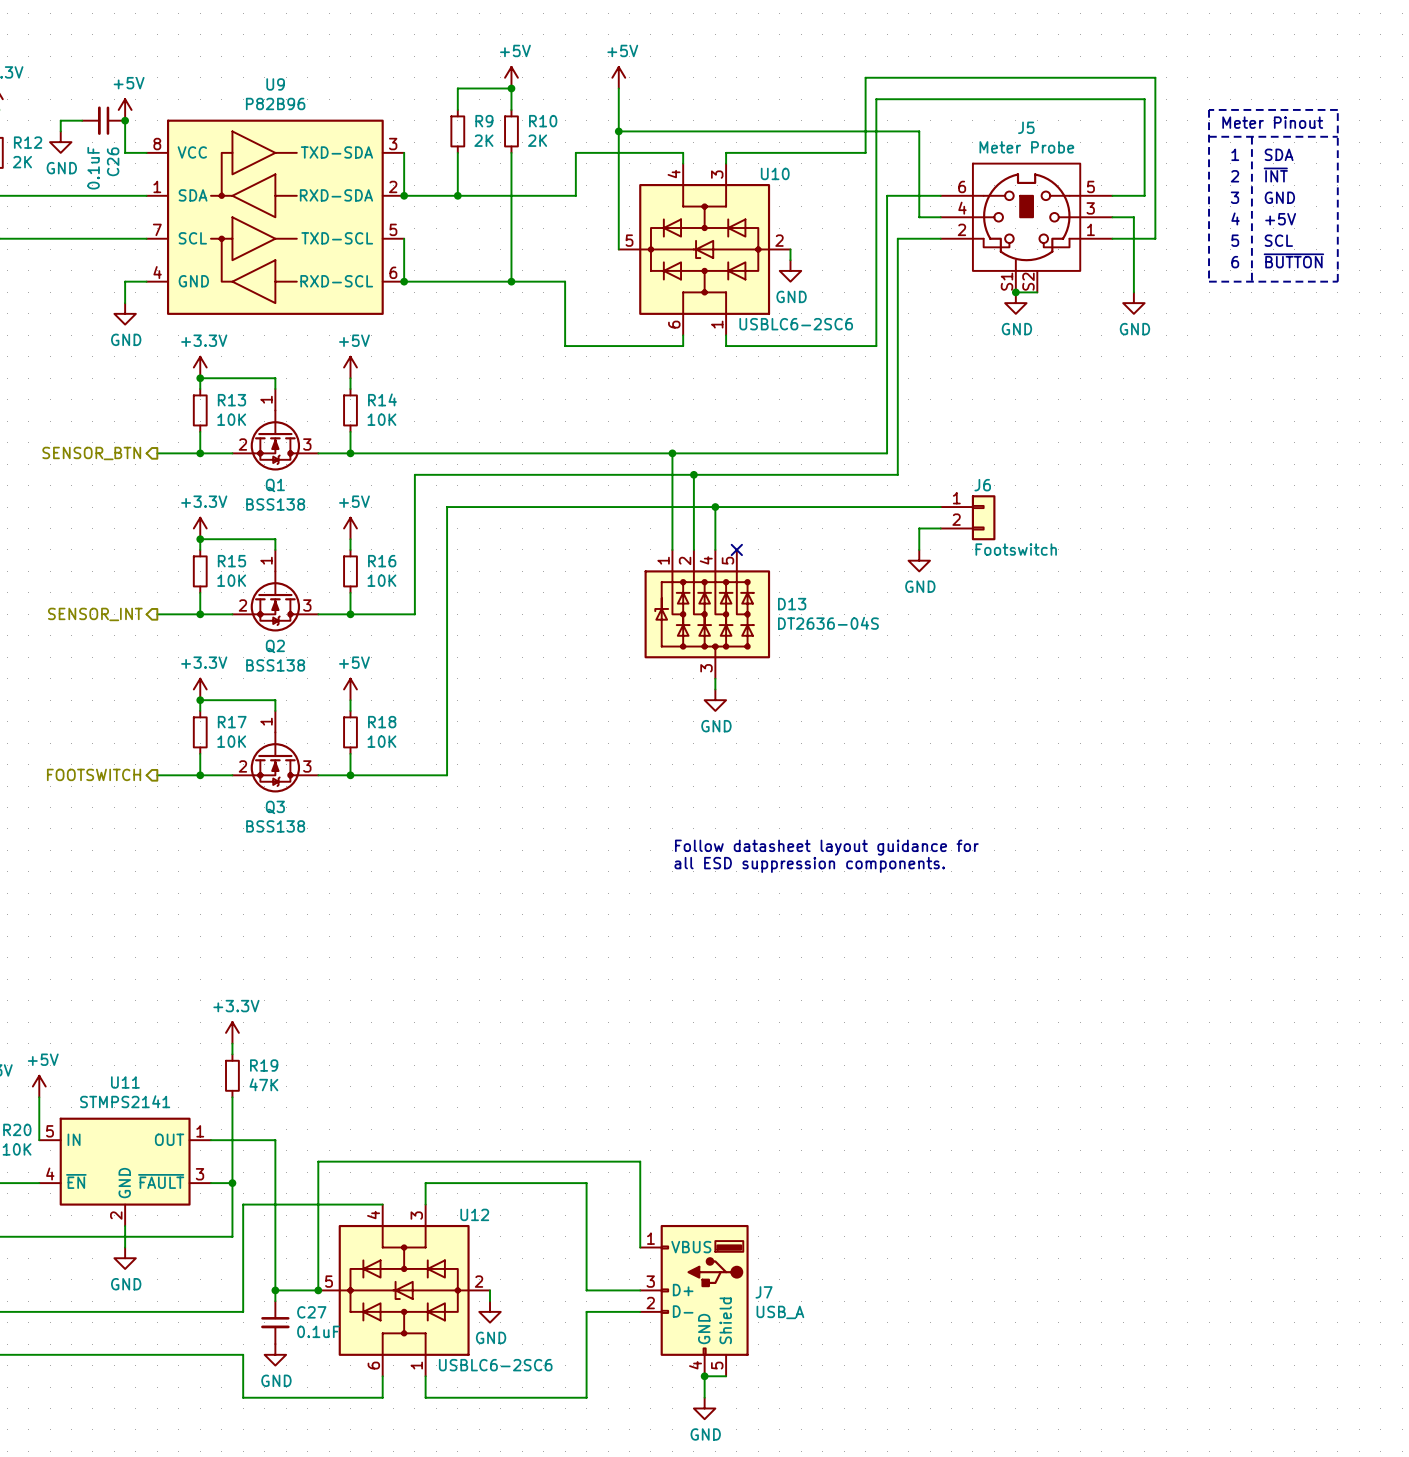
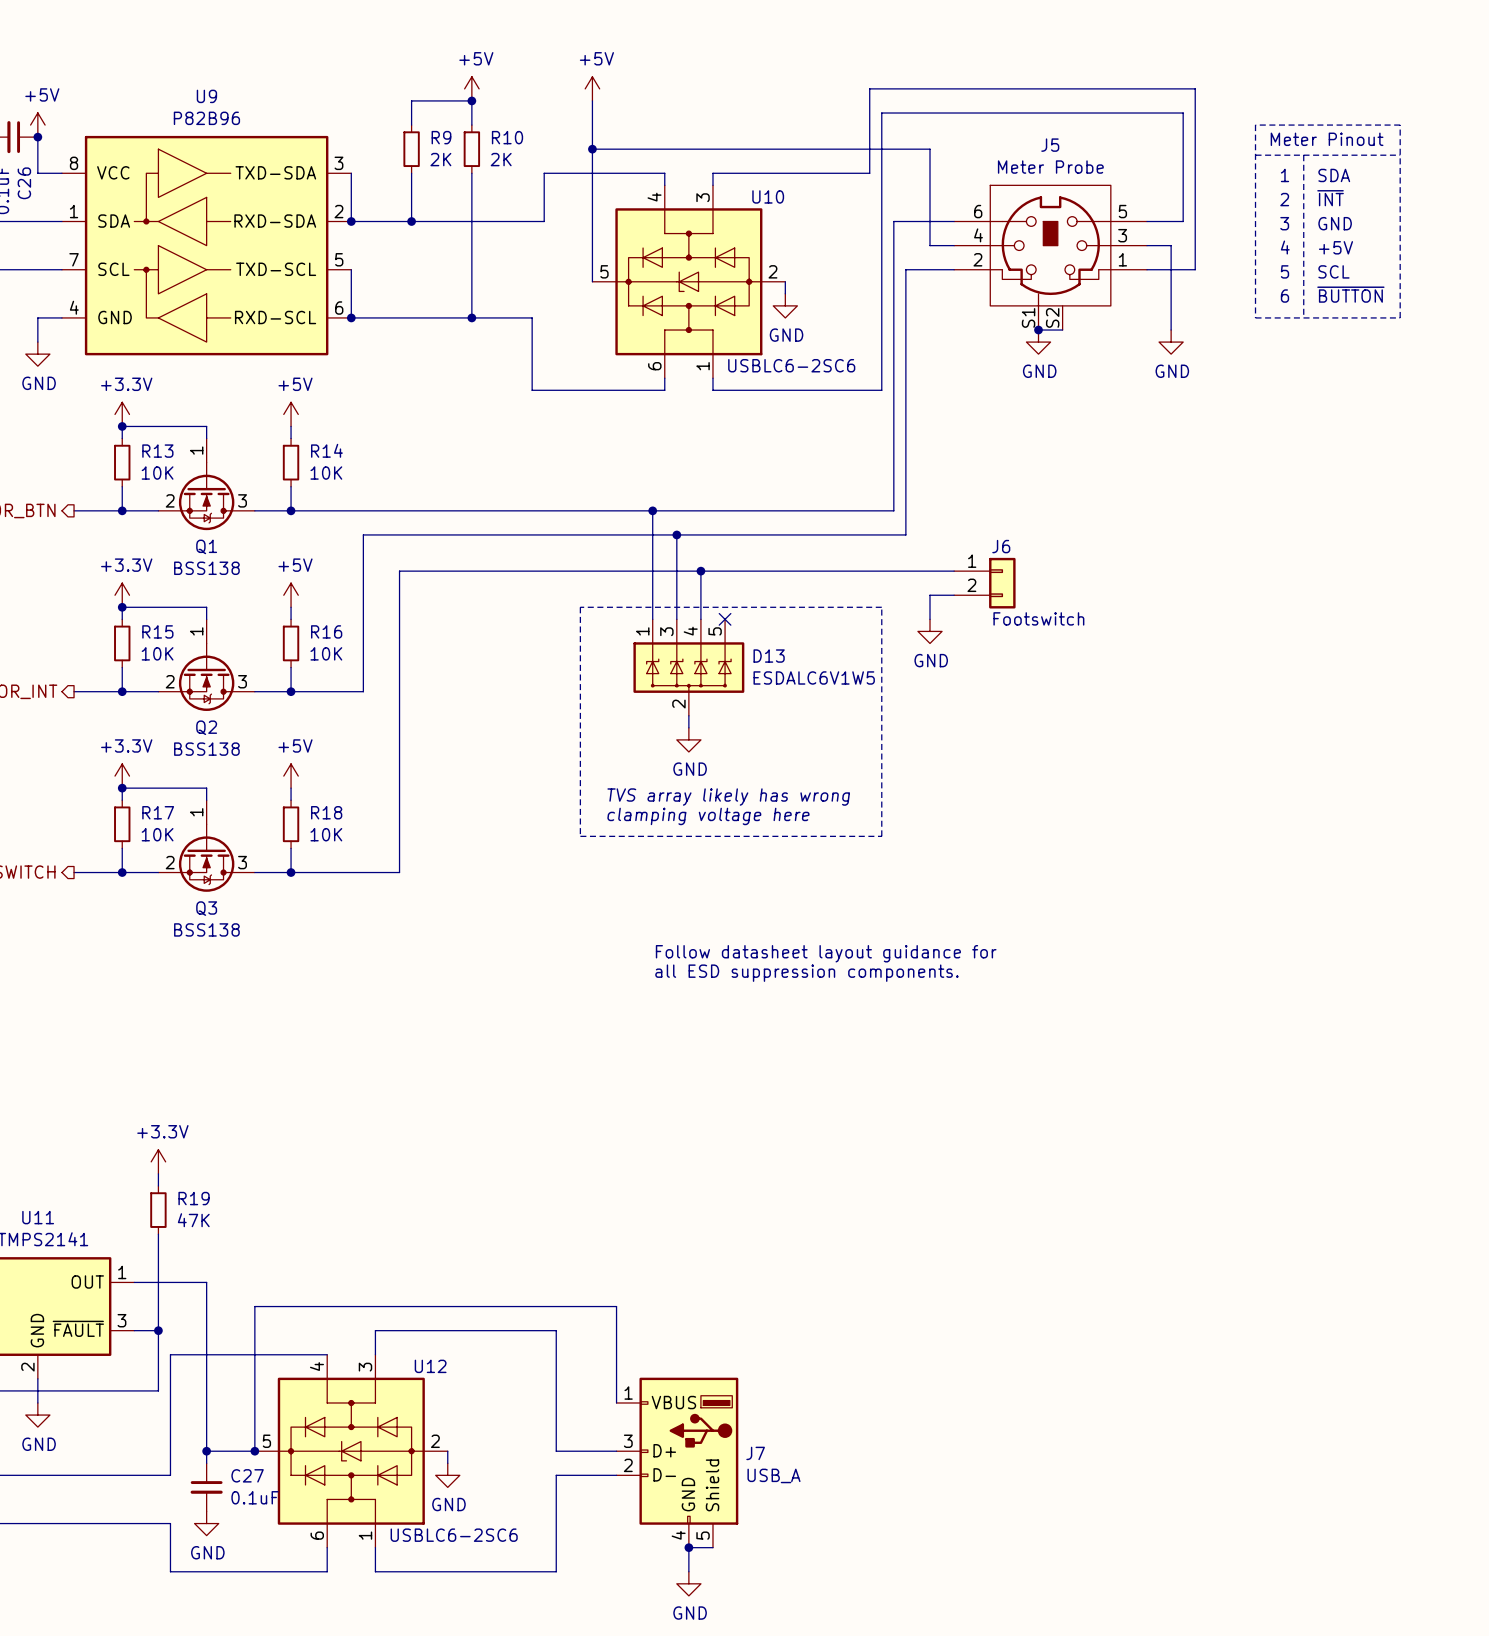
line: none -> (580, 607) (580, 836) (881, 836) (881, 607) (580, 607)
D13 symbol: [644, 549, 771, 679] -> [633, 619, 745, 716]
D13 value: DT2636-04S (828, 623) -> ESDALC6V1W5 (814, 677)
power symbol position: GND (715, 700) -> GND (688, 739)
text: none -> TVS array likely has wrong (728, 797)
text: none -> clamping voltage here (708, 816)

